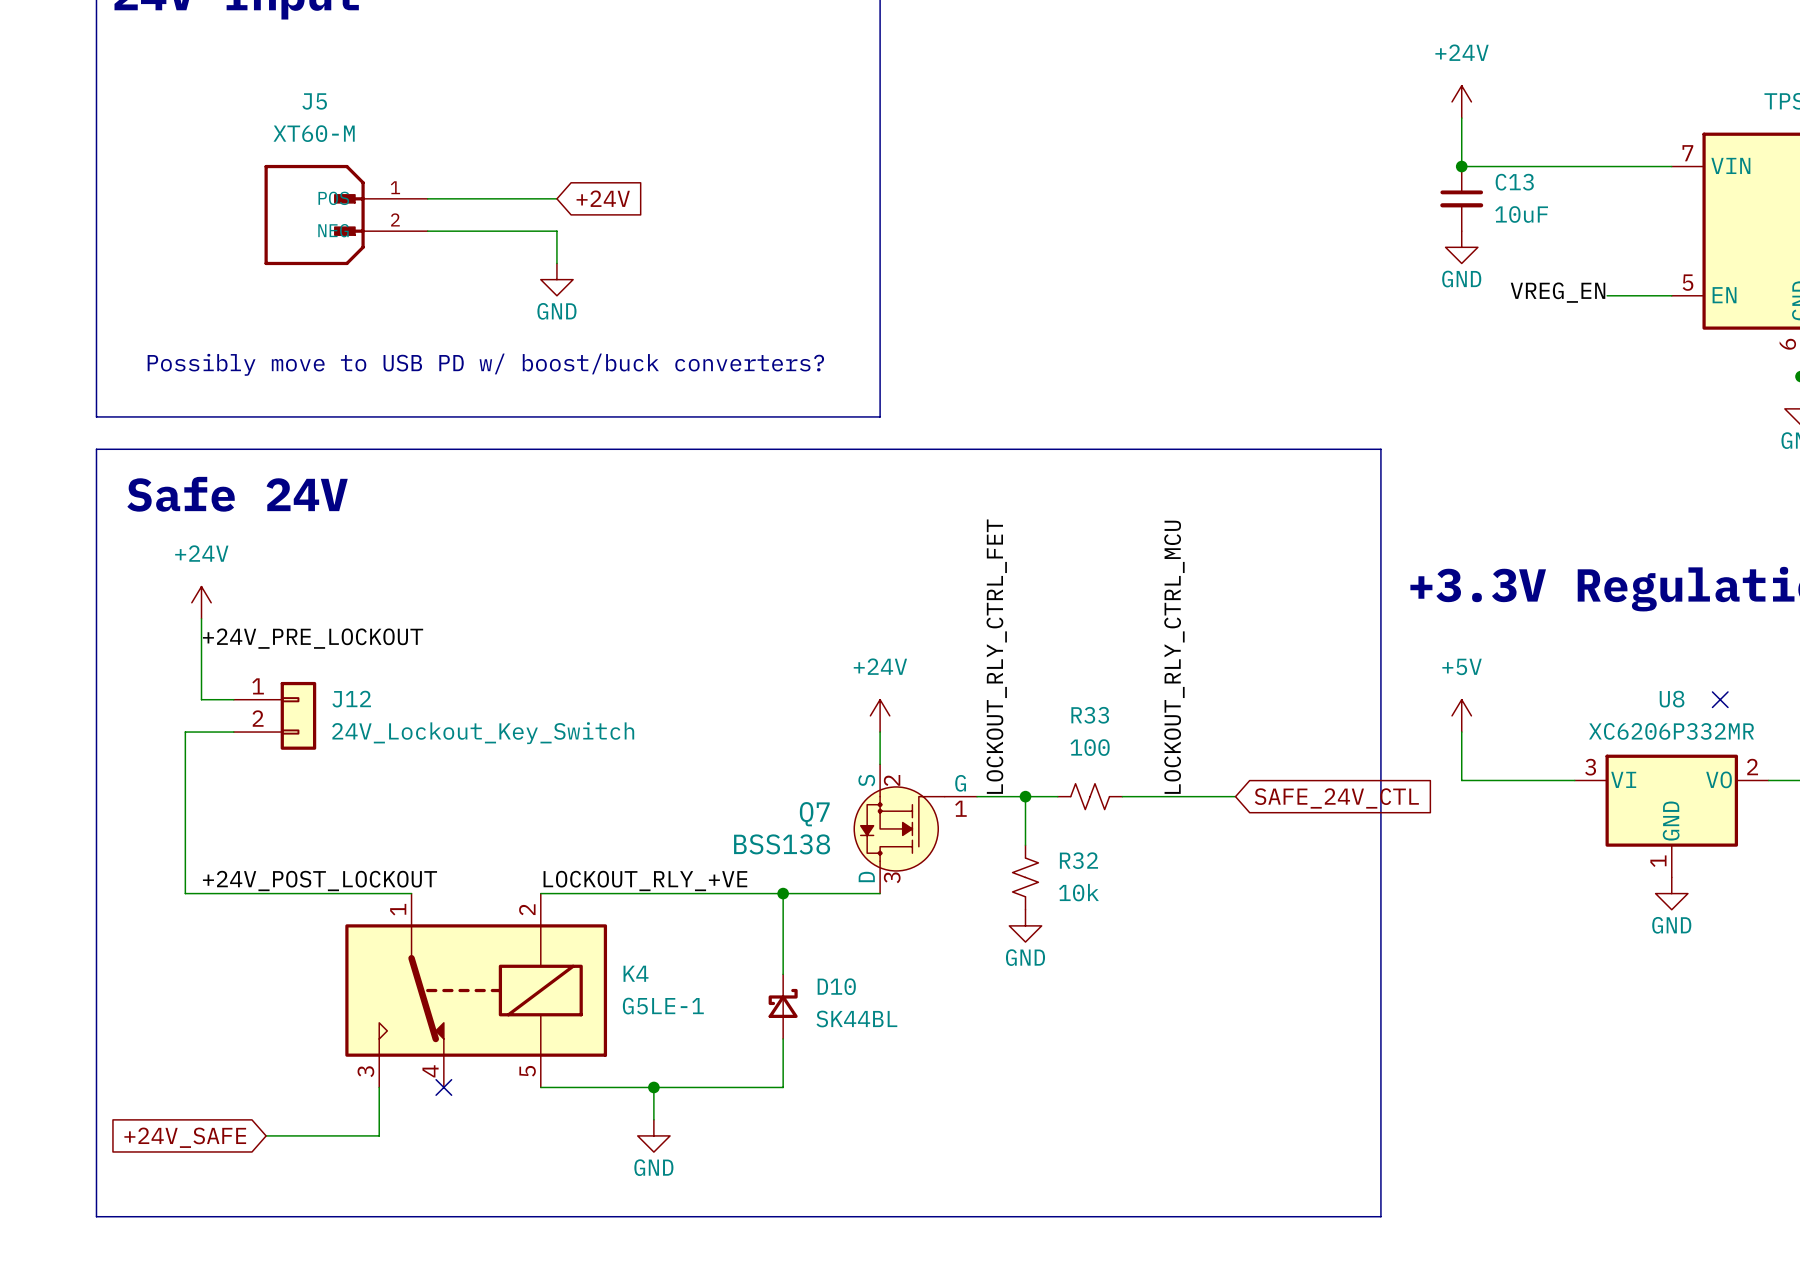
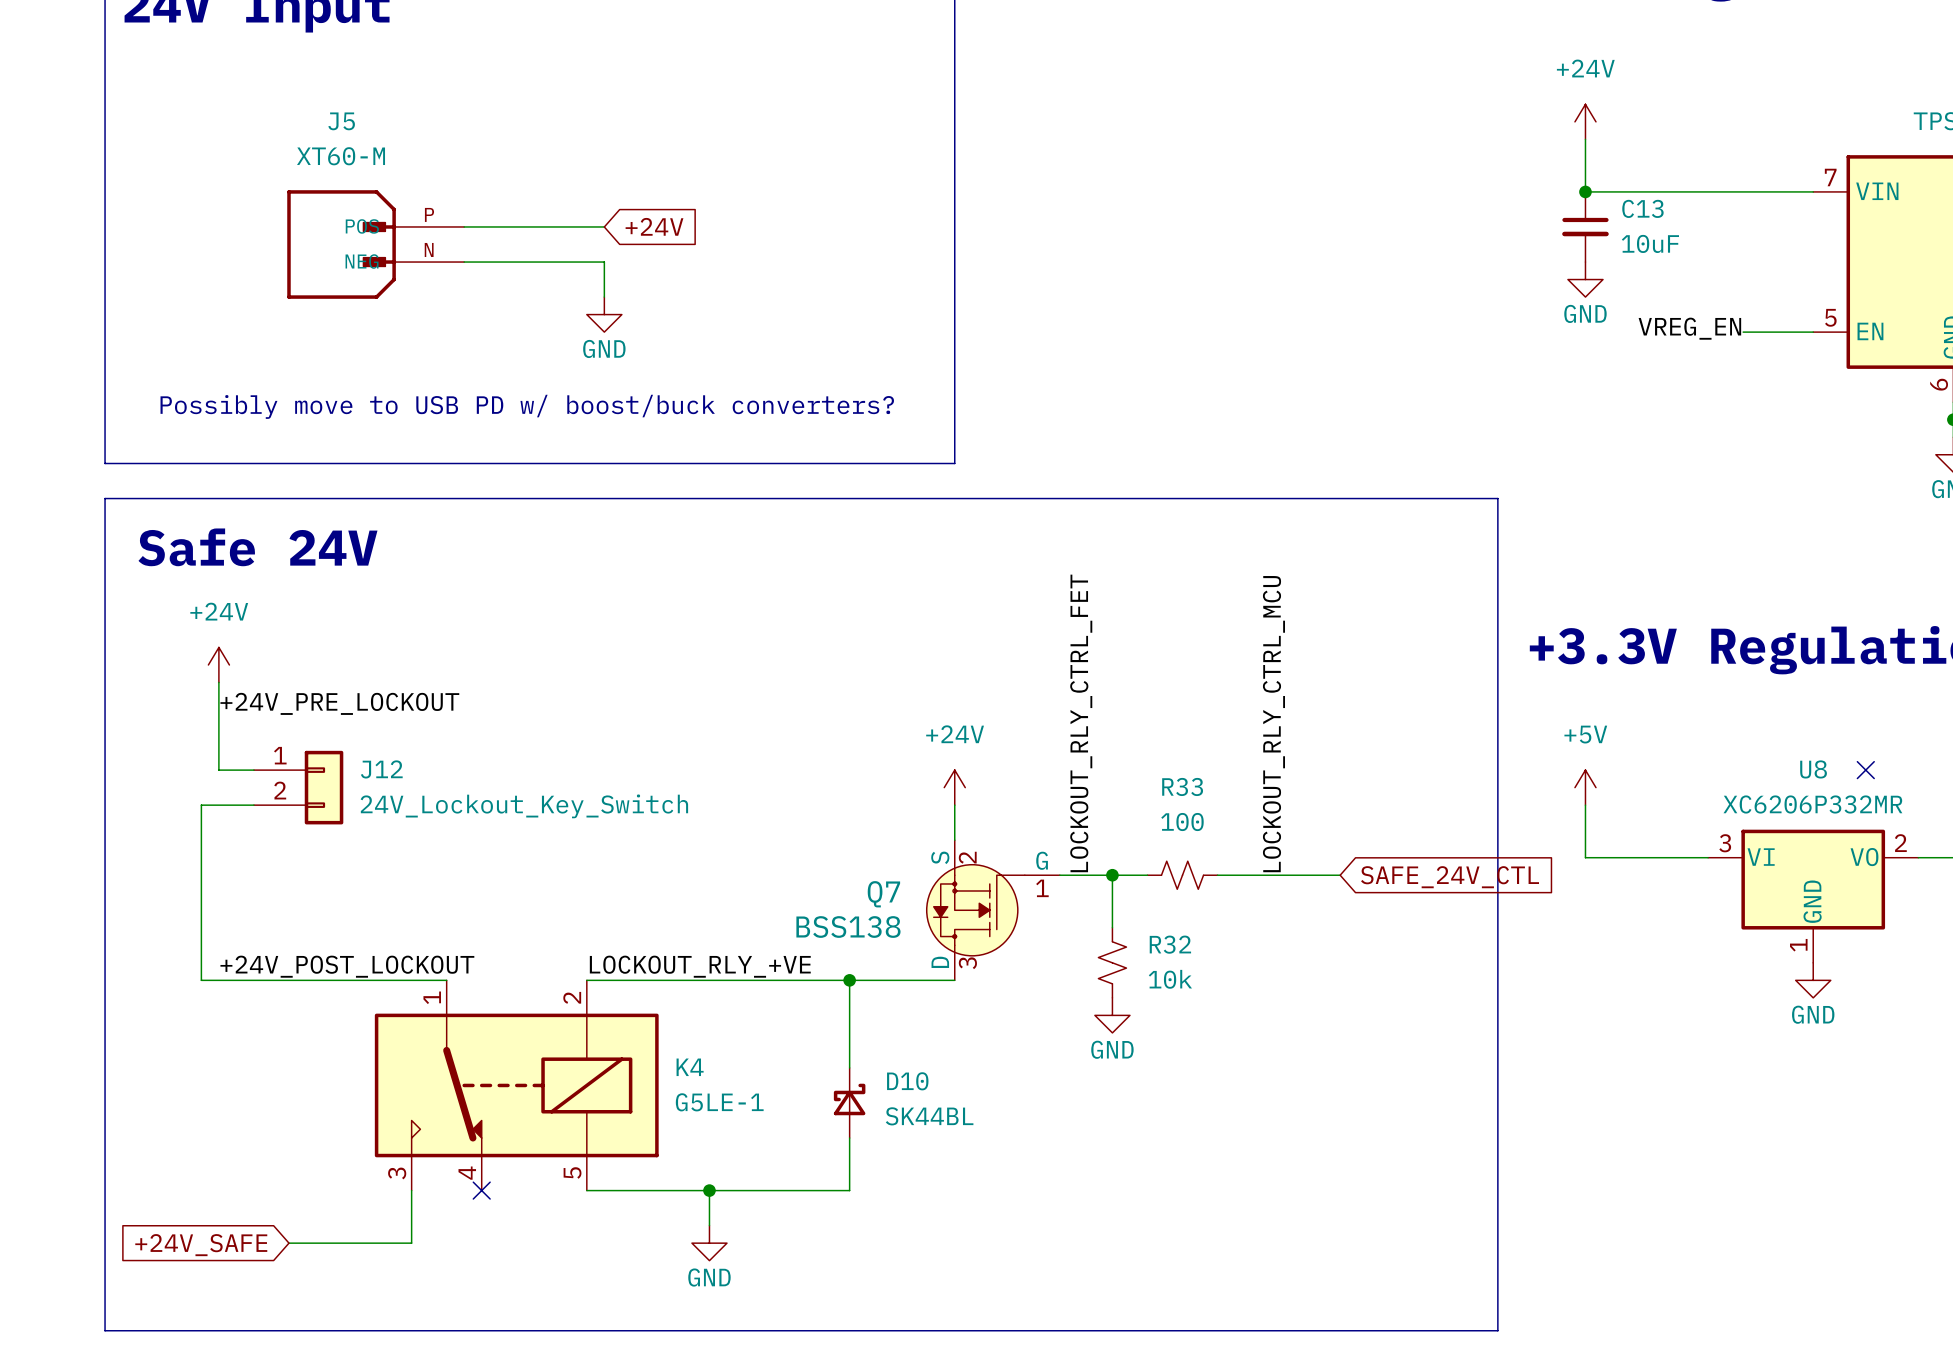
J5 pin number: 1 (395, 187) -> P (429, 214)
J5 pin number: 2 (395, 219) -> N (429, 249)

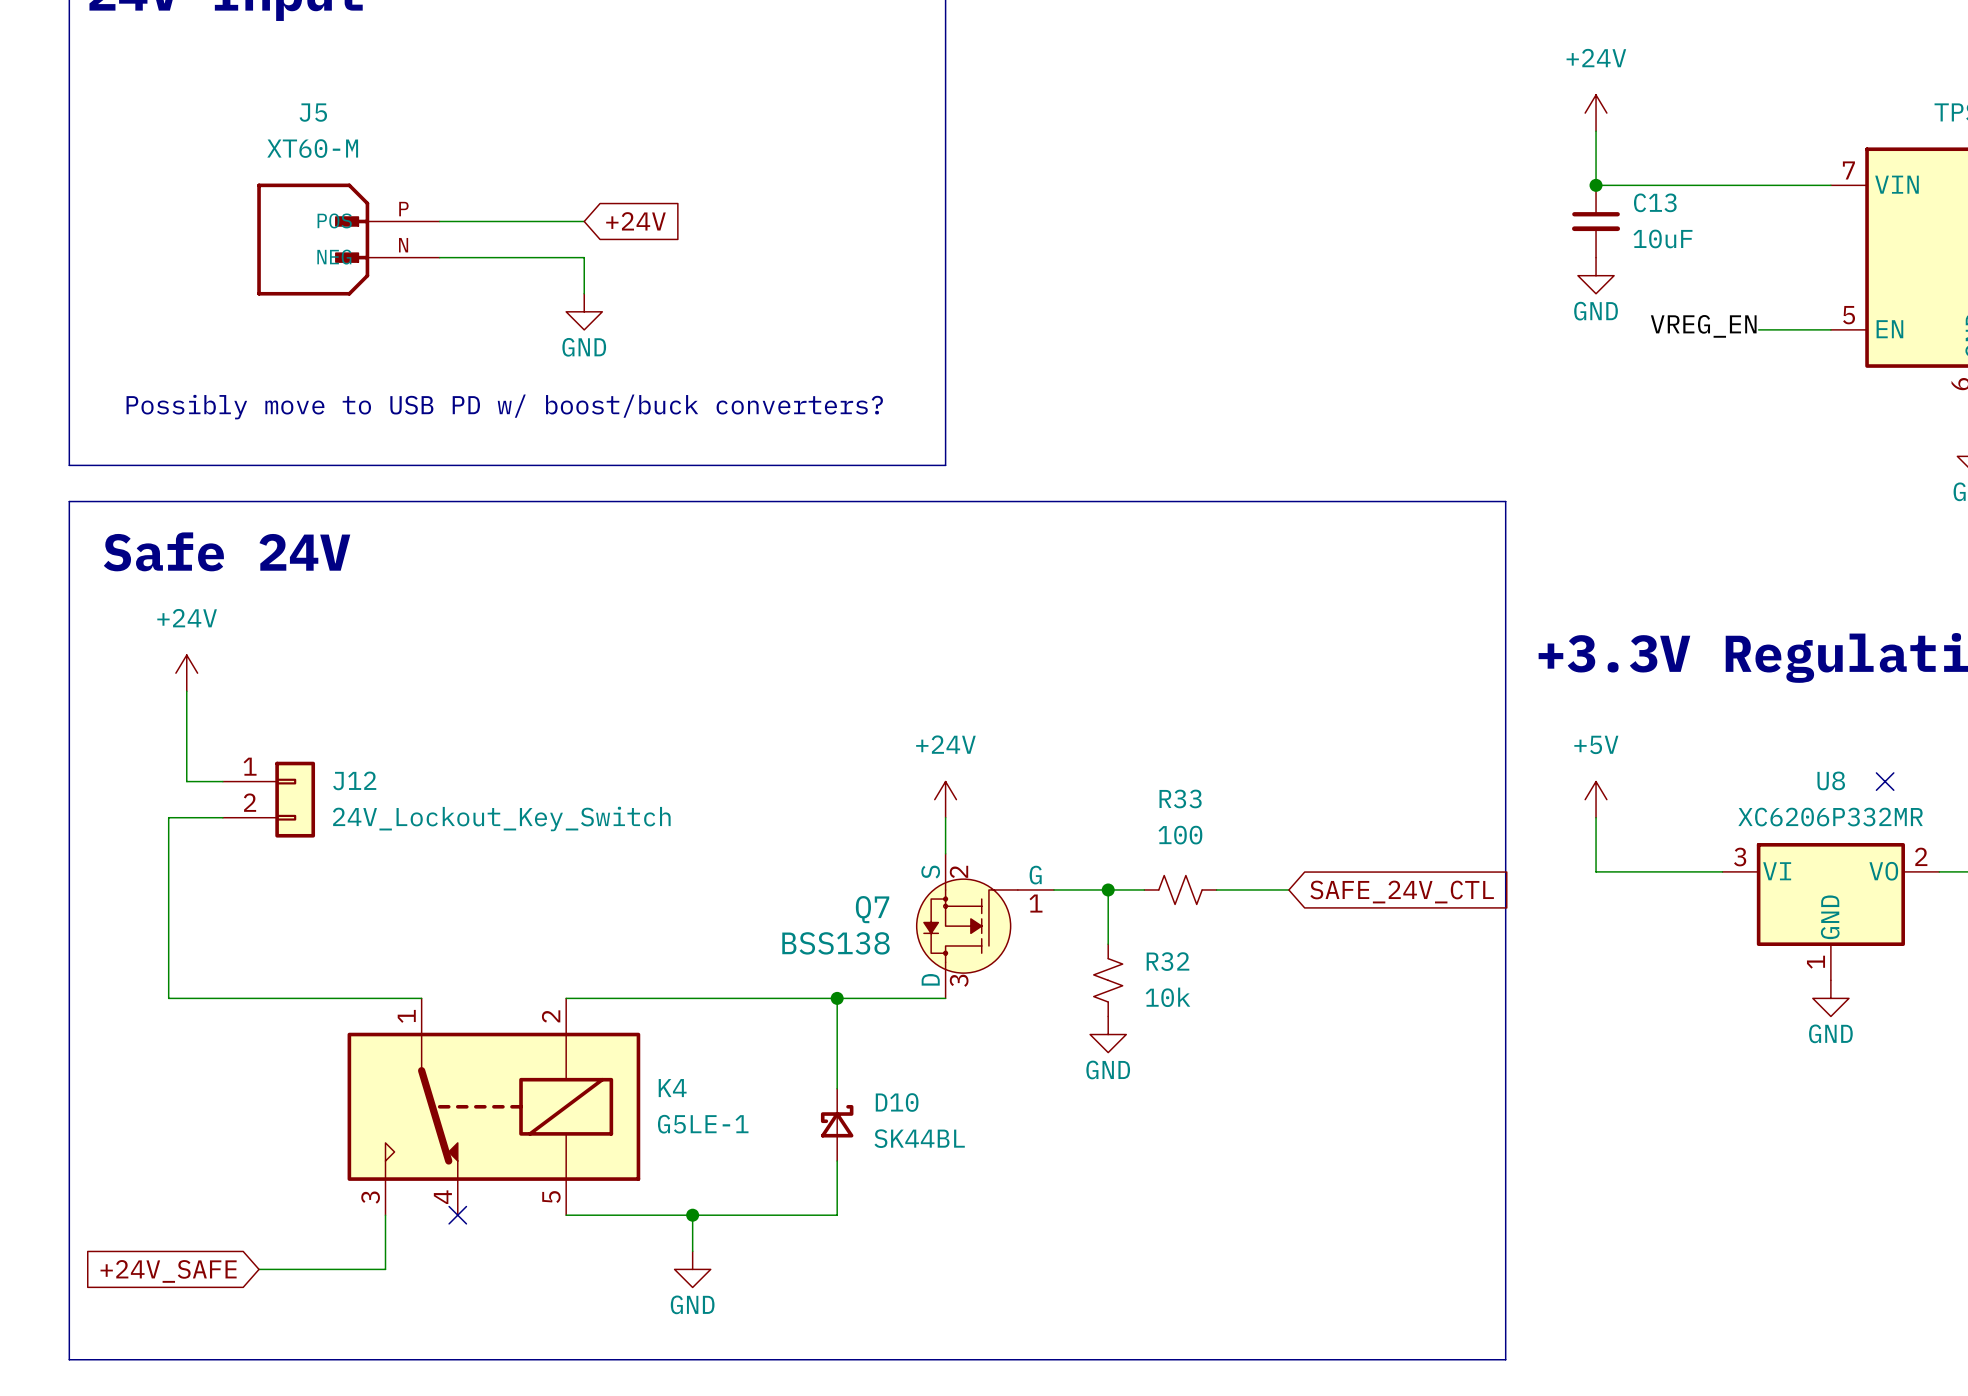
label: +24V_PRE_LOCKOUT (339, 703) -> none
label: LOCKOUT_RLY_CTRL_FET (1081, 723) -> none
label: LOCKOUT_RLY_CTRL_MCU (1273, 724) -> none
wire: (1287, 875) (1340, 875) -> none
global label position: SAFE_24V_CTL (1450, 877) -> SAFE_24V_CTL (1402, 892)
label: +24V_POST_LOCKOUT (347, 966) -> none
label: LOCKOUT_RLY_+VE (700, 966) -> none

